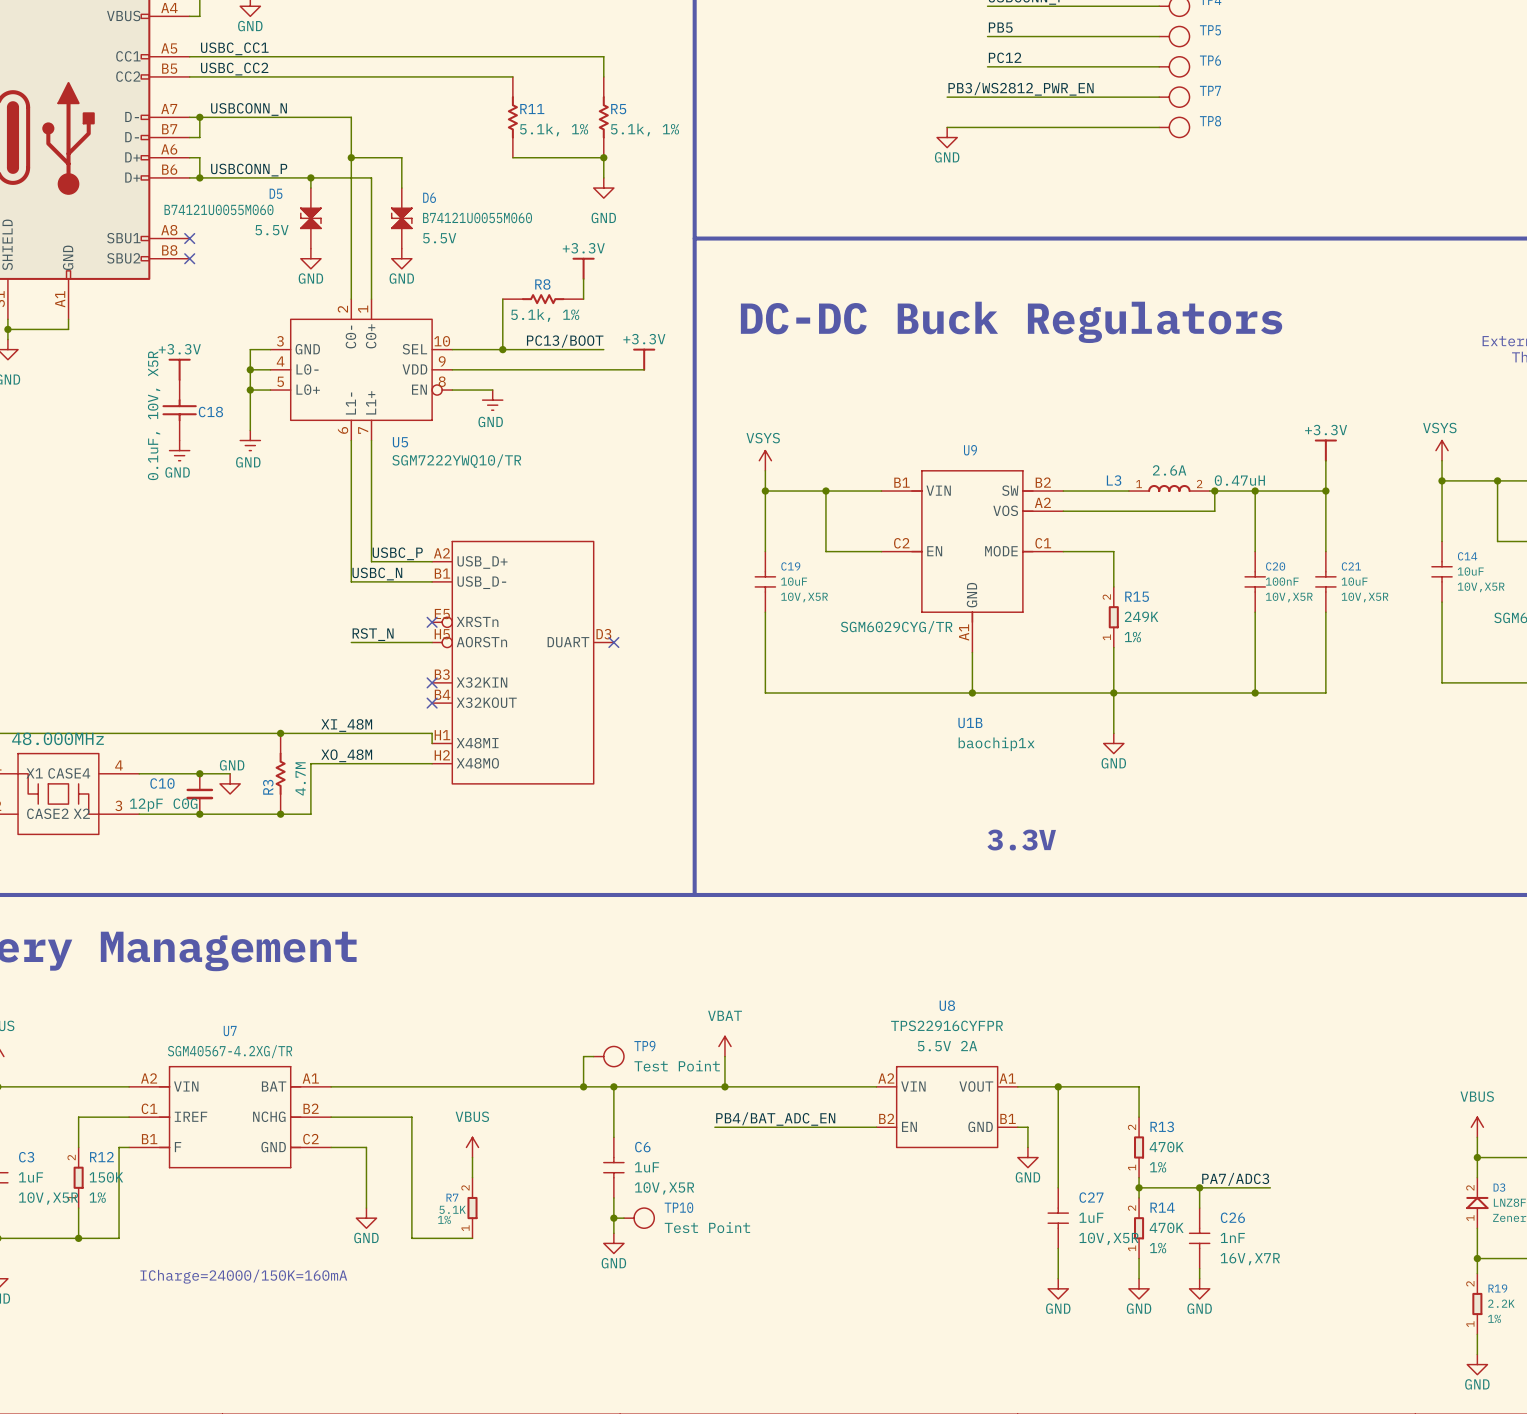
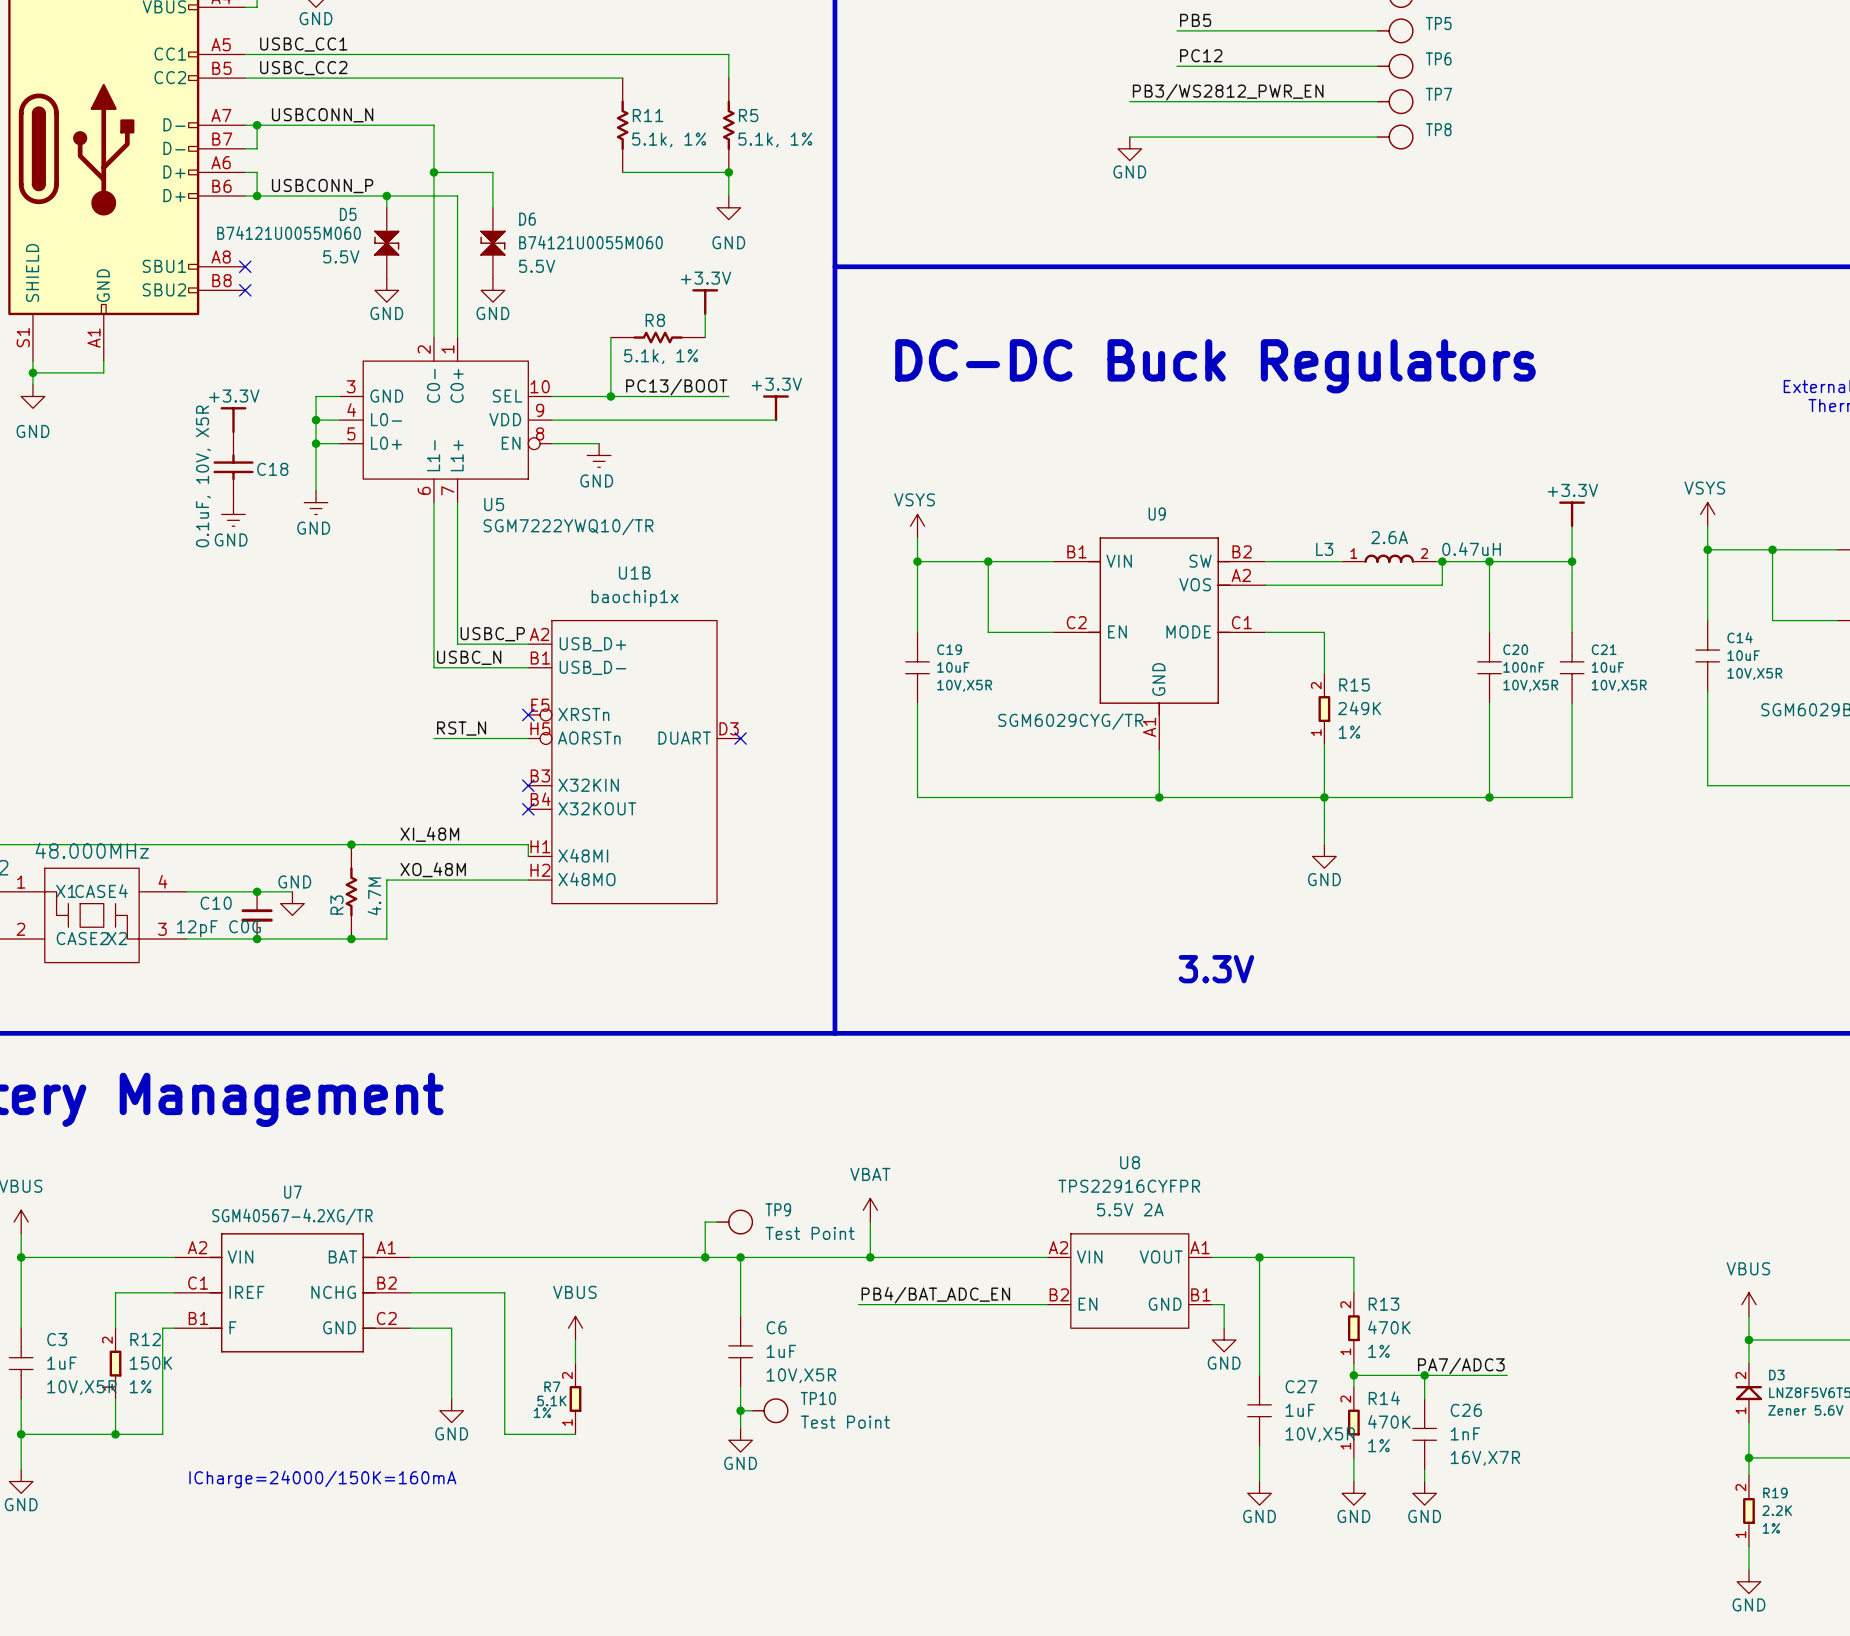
U1B name position: U1B (970, 723) -> U1B (634, 572)
U1B value position: baochip1x (996, 744) -> baochip1x (635, 598)

